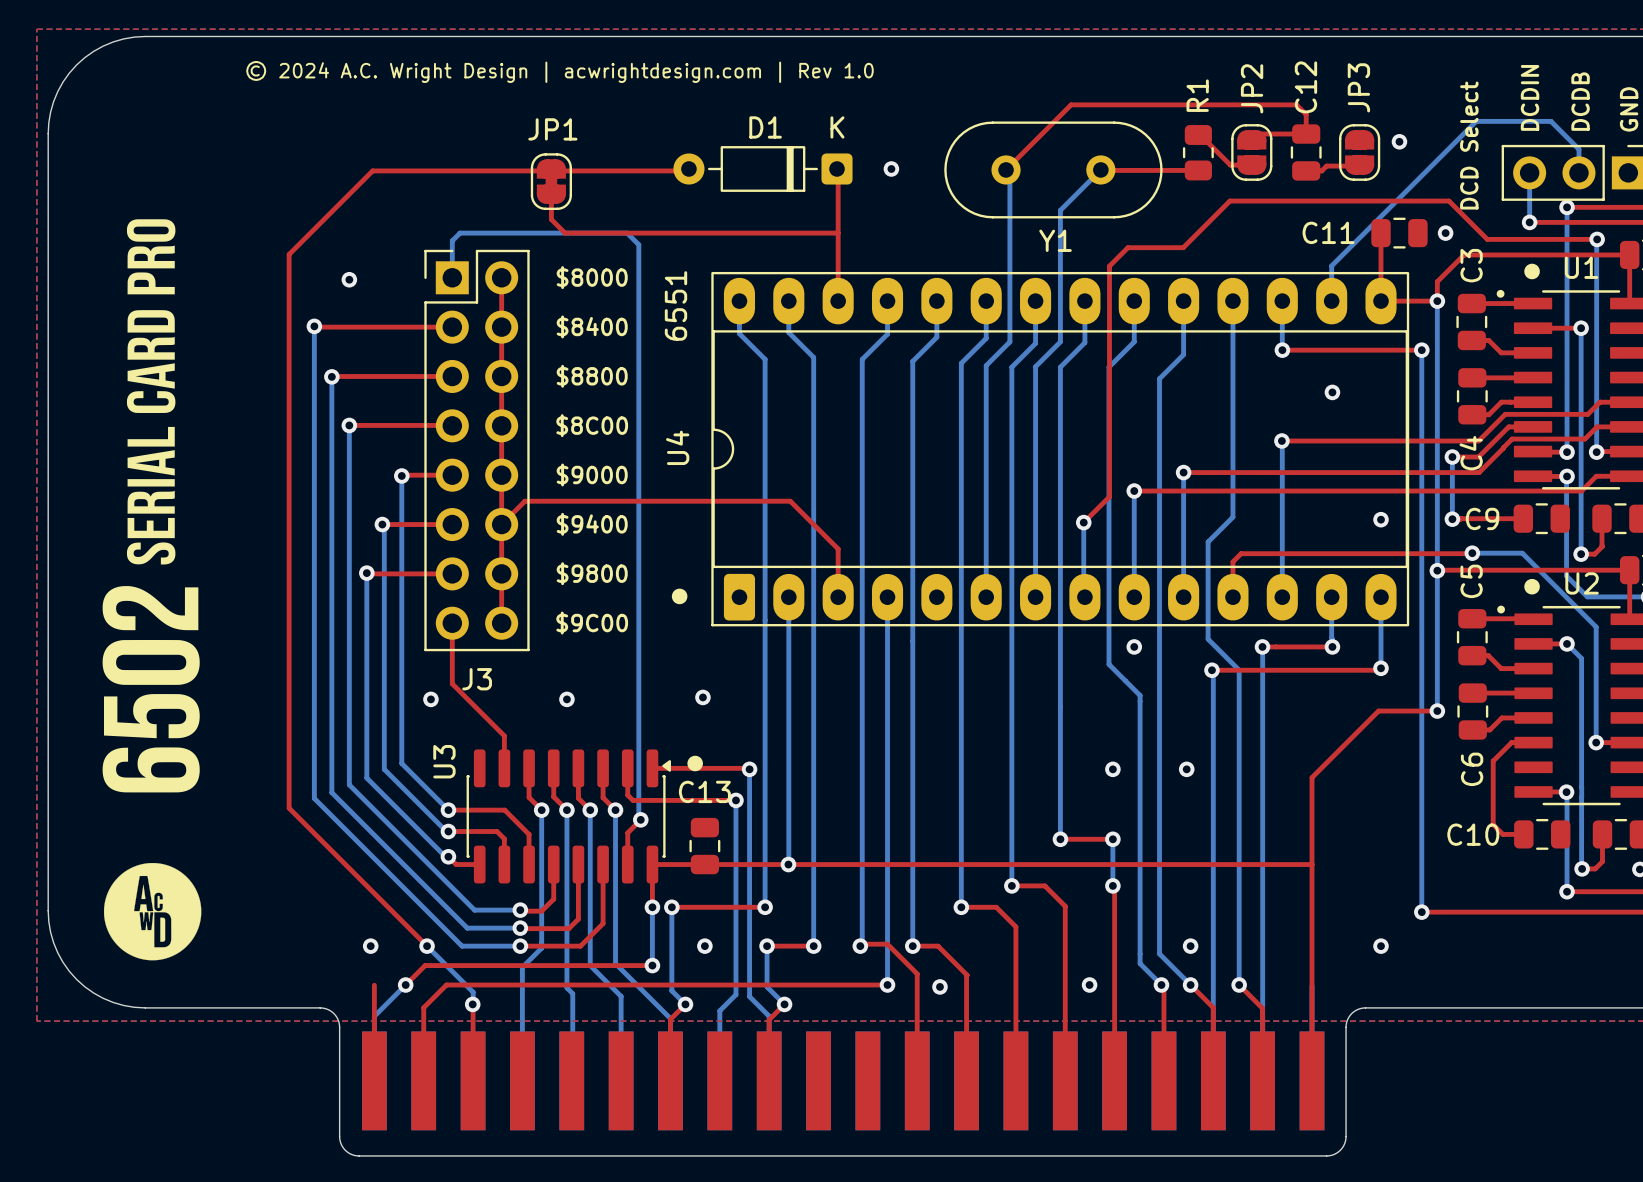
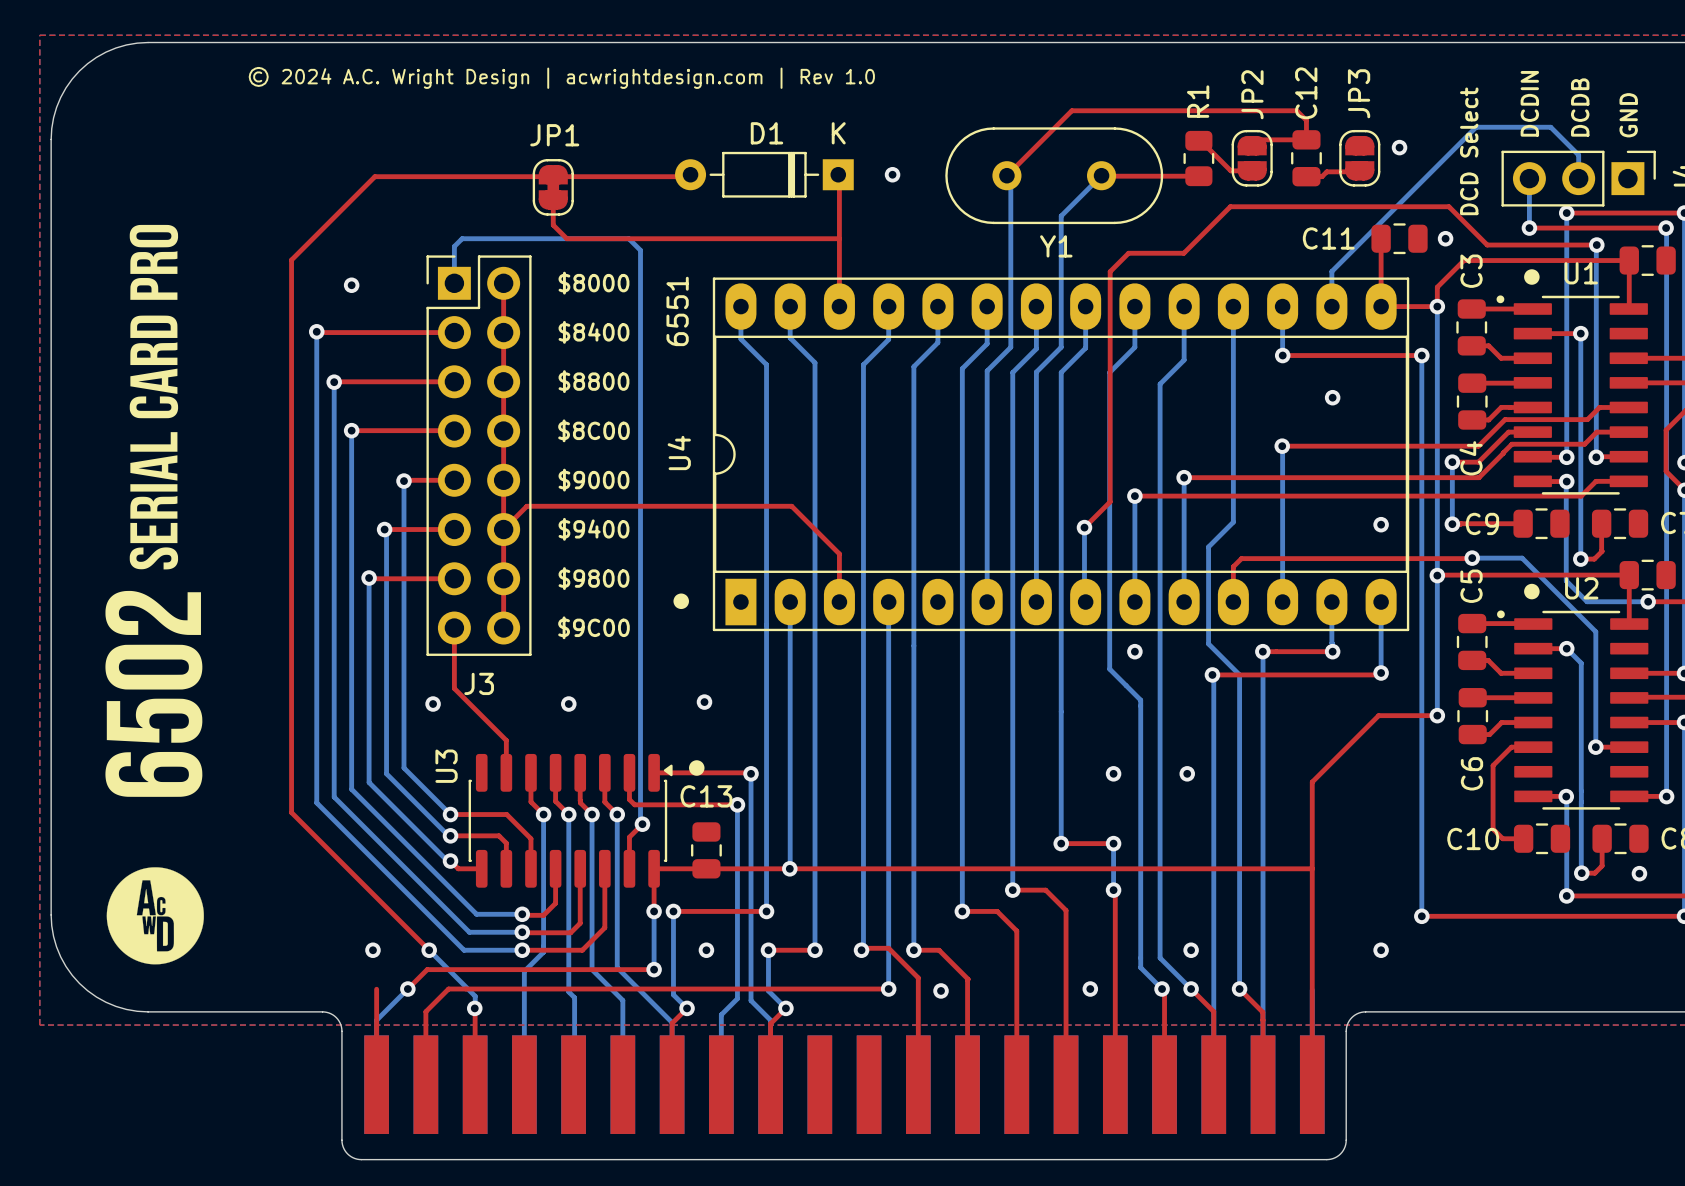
D1 footprint: [673, 146, 853, 192] -> [675, 151, 854, 198]
U4 footprint: [711, 271, 1410, 627] -> [712, 277, 1410, 632]

